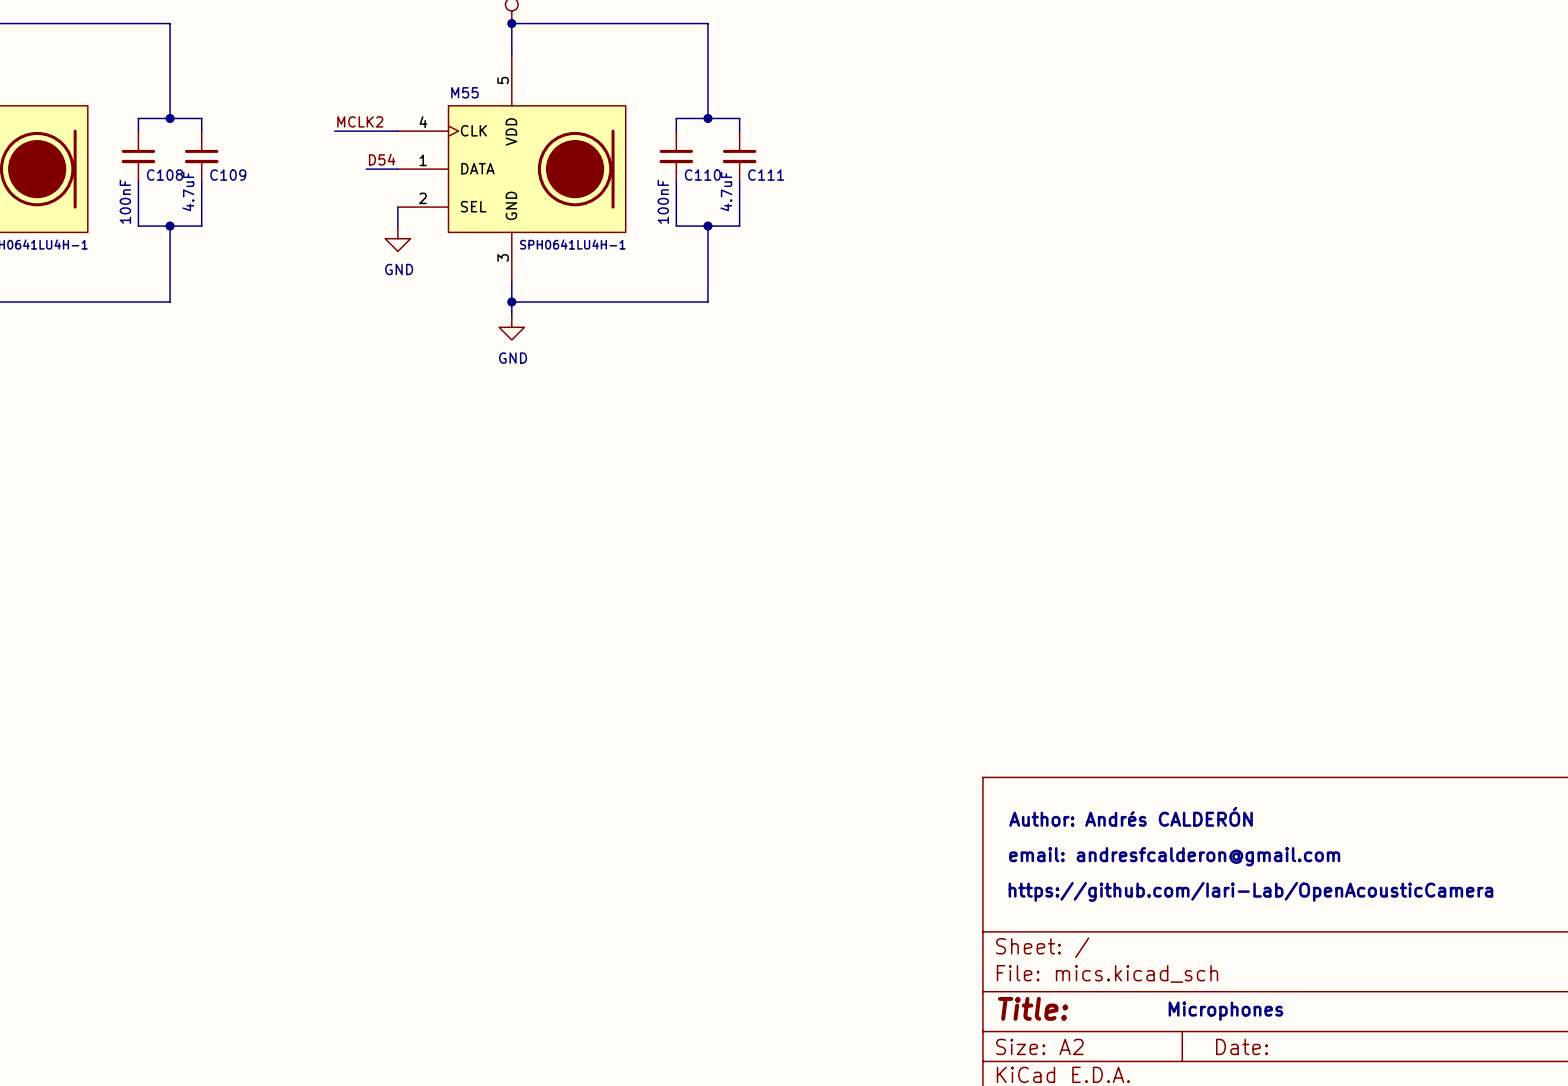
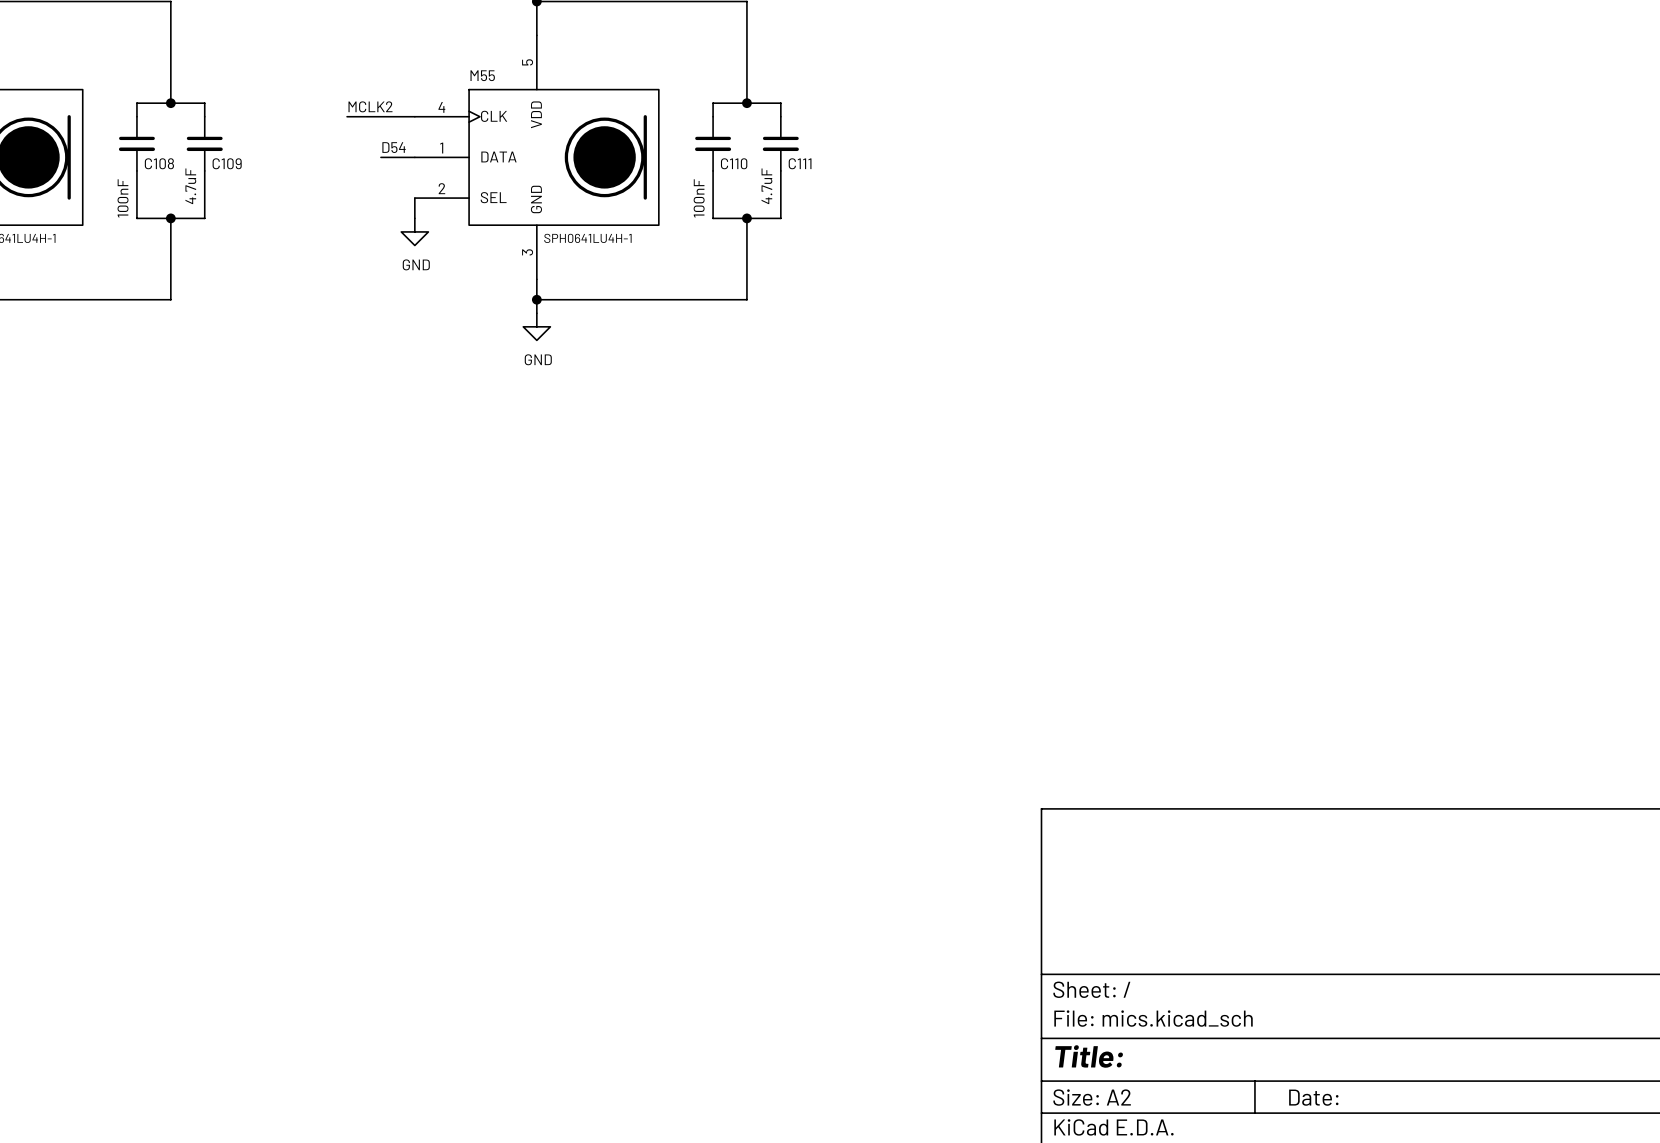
text: Author: Andrés CALDERÓN (1131, 816) -> none
text: email: andresfcalderon@gmail.com (1174, 856) -> none
text: https://github.com/Iari-Lab/OpenAcousticCamera (1250, 891) -> none
text: Microphones (1225, 1011) -> none

